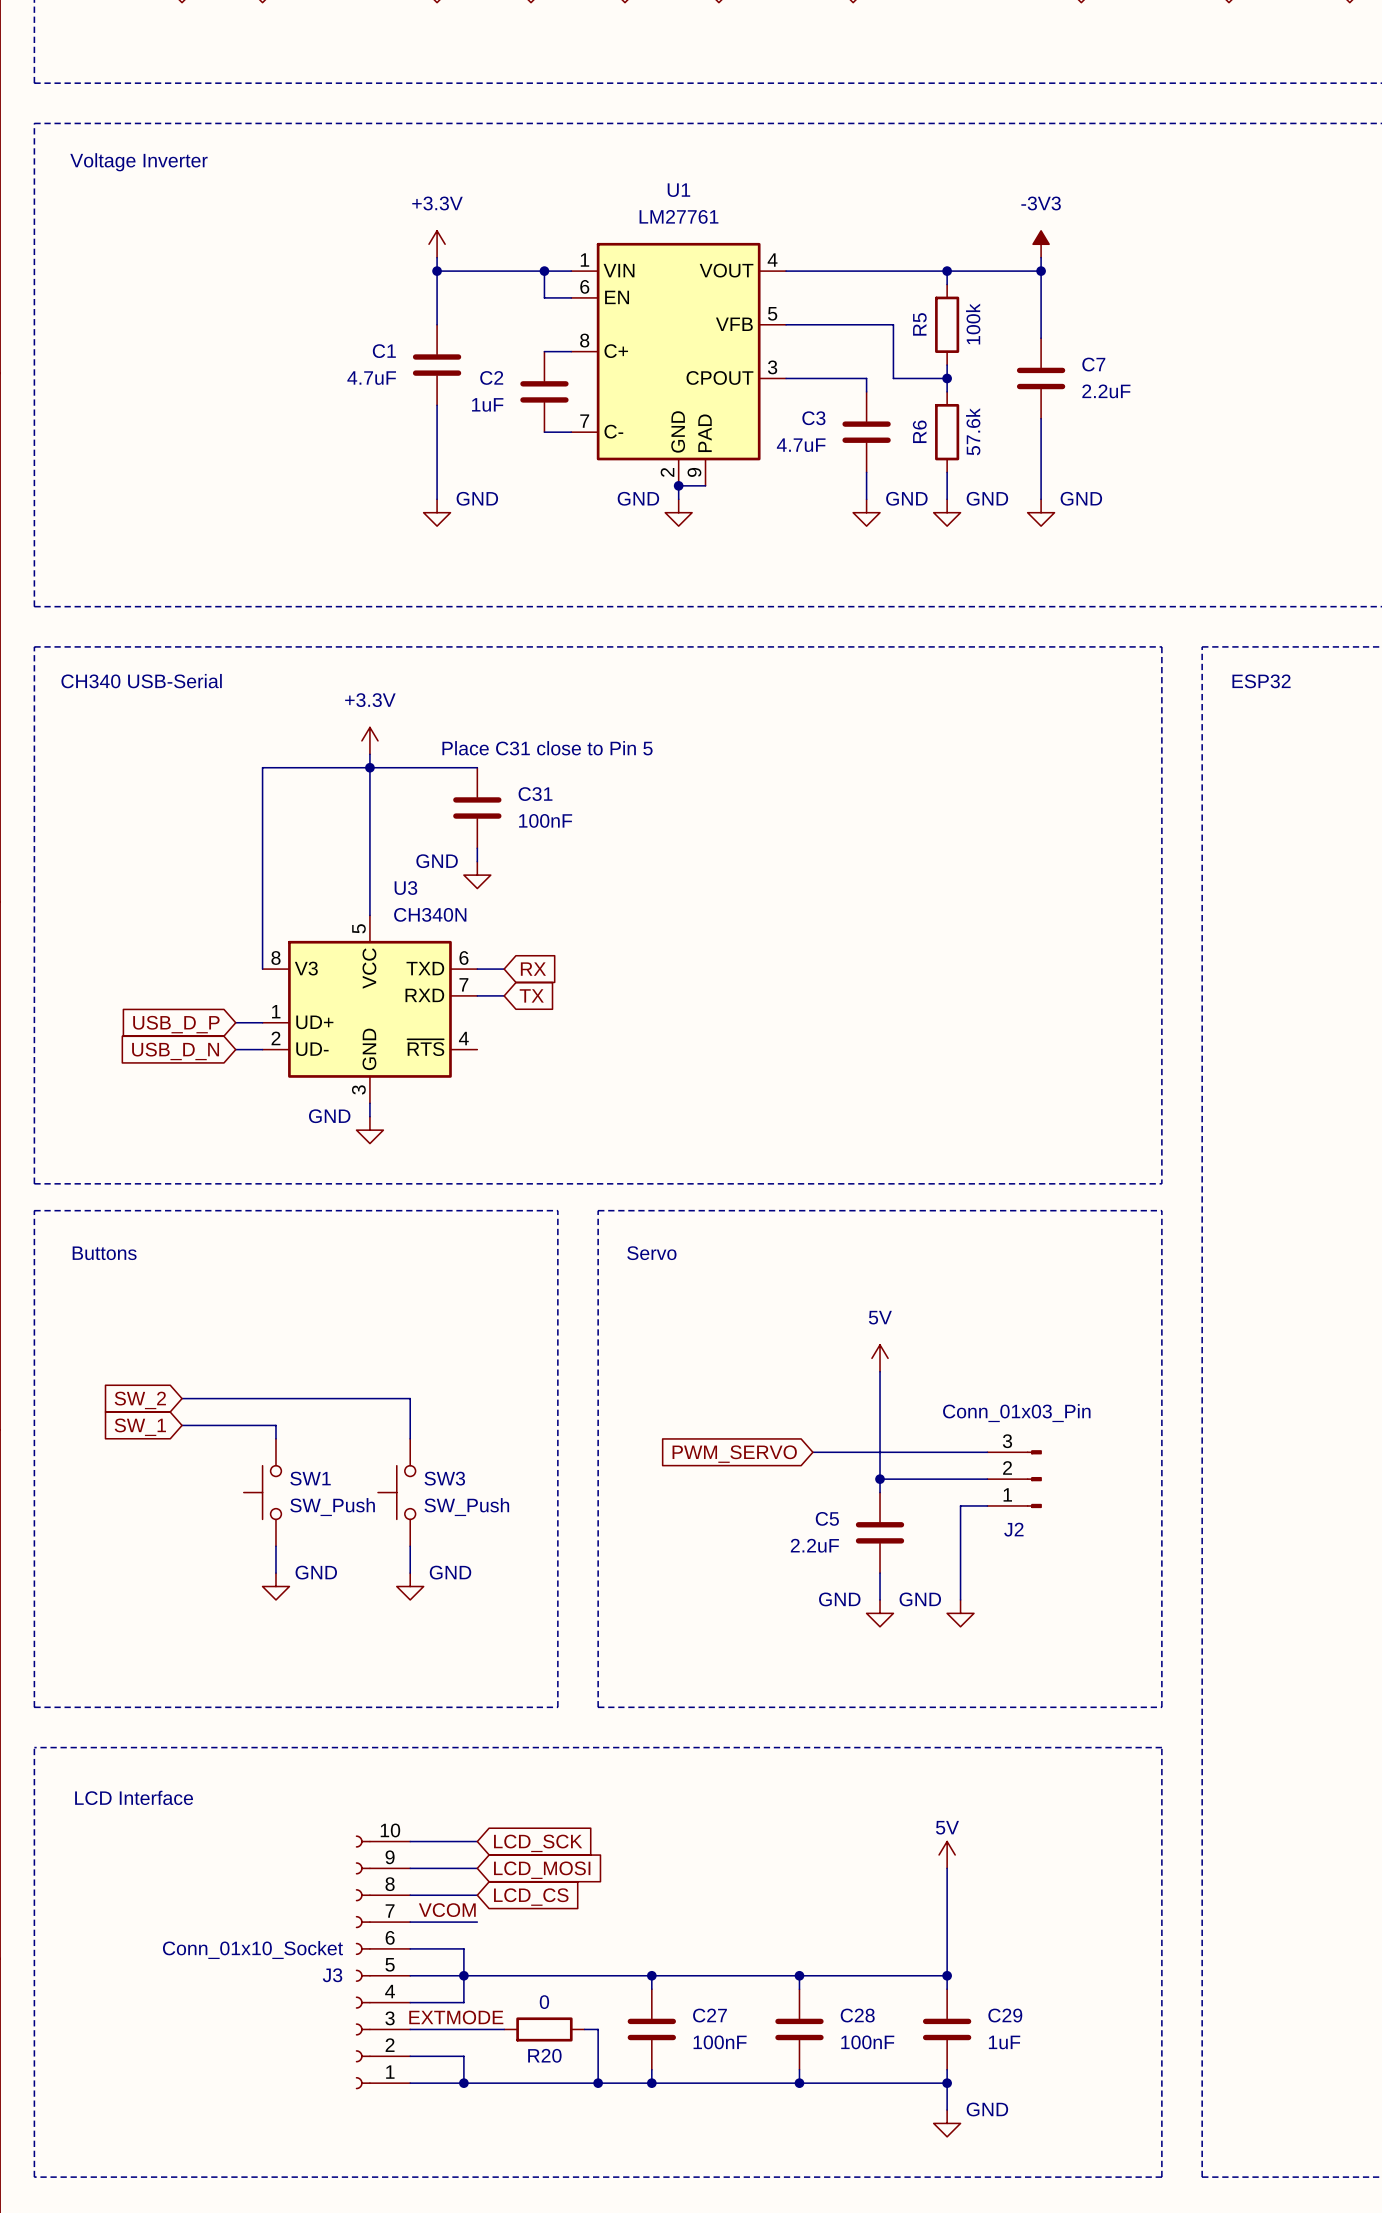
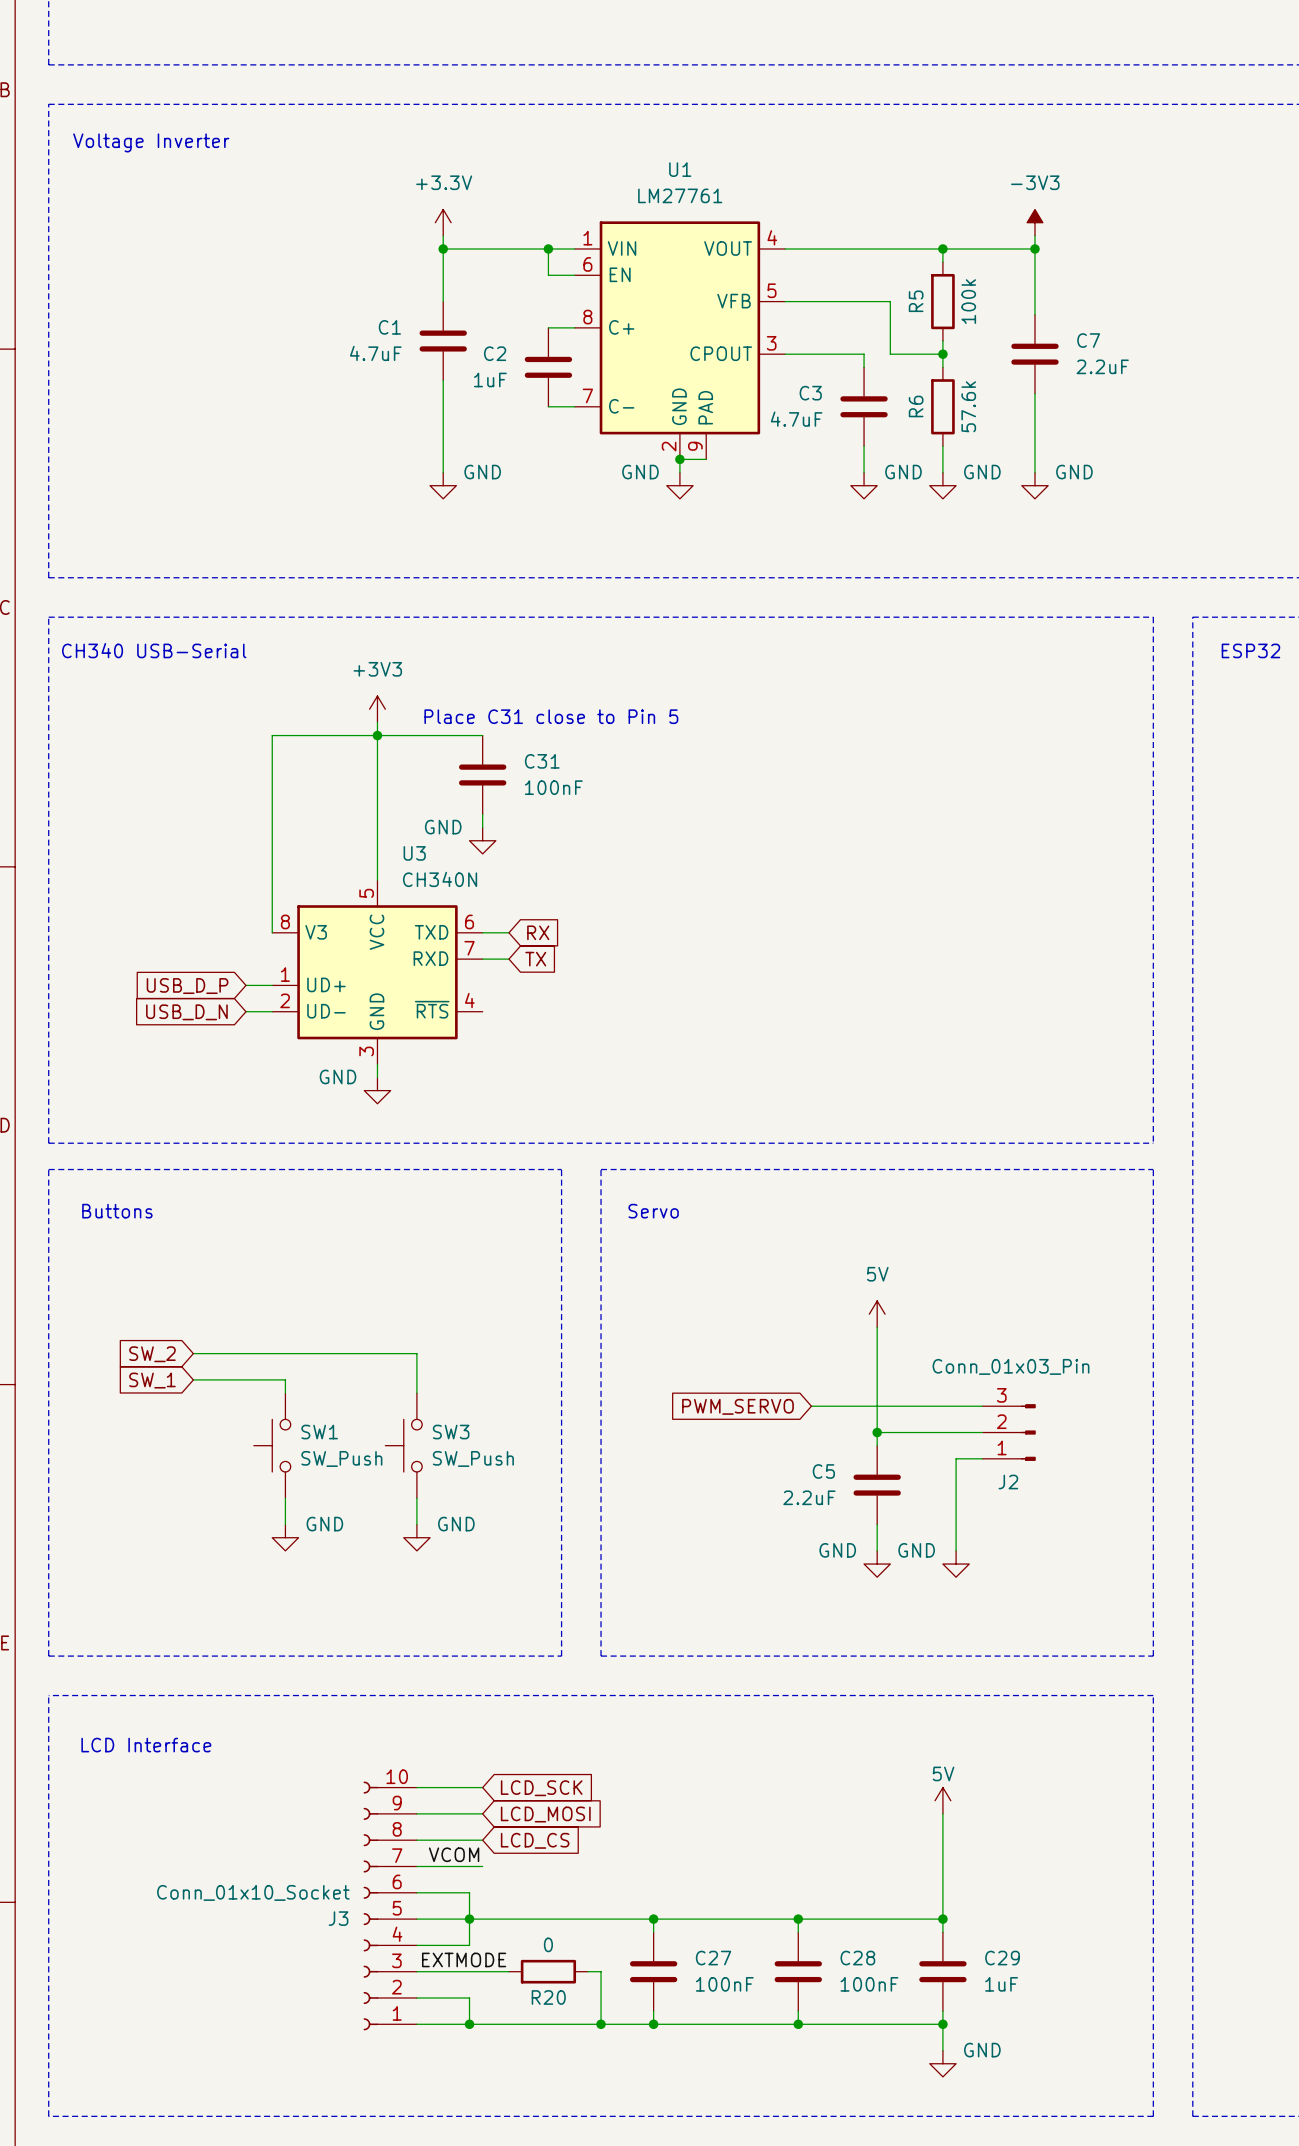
power symbol: +3.3V (369, 740) -> +3V3 (377, 709)

